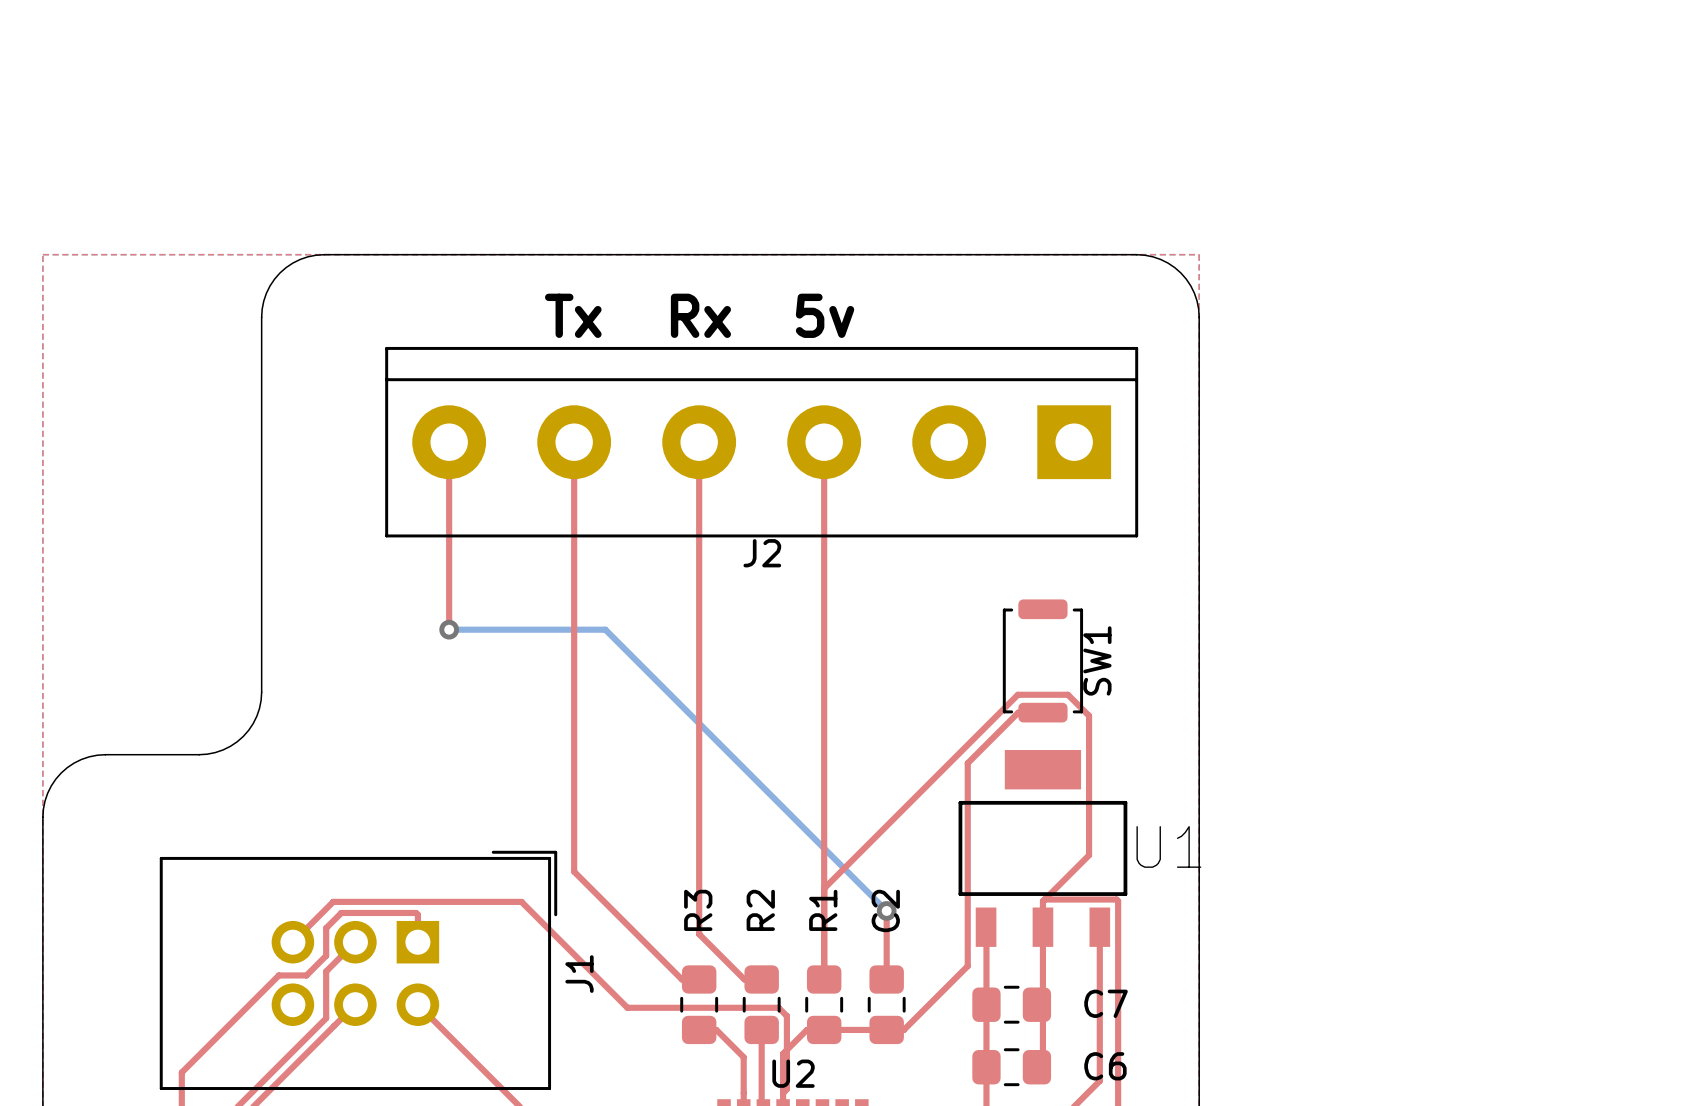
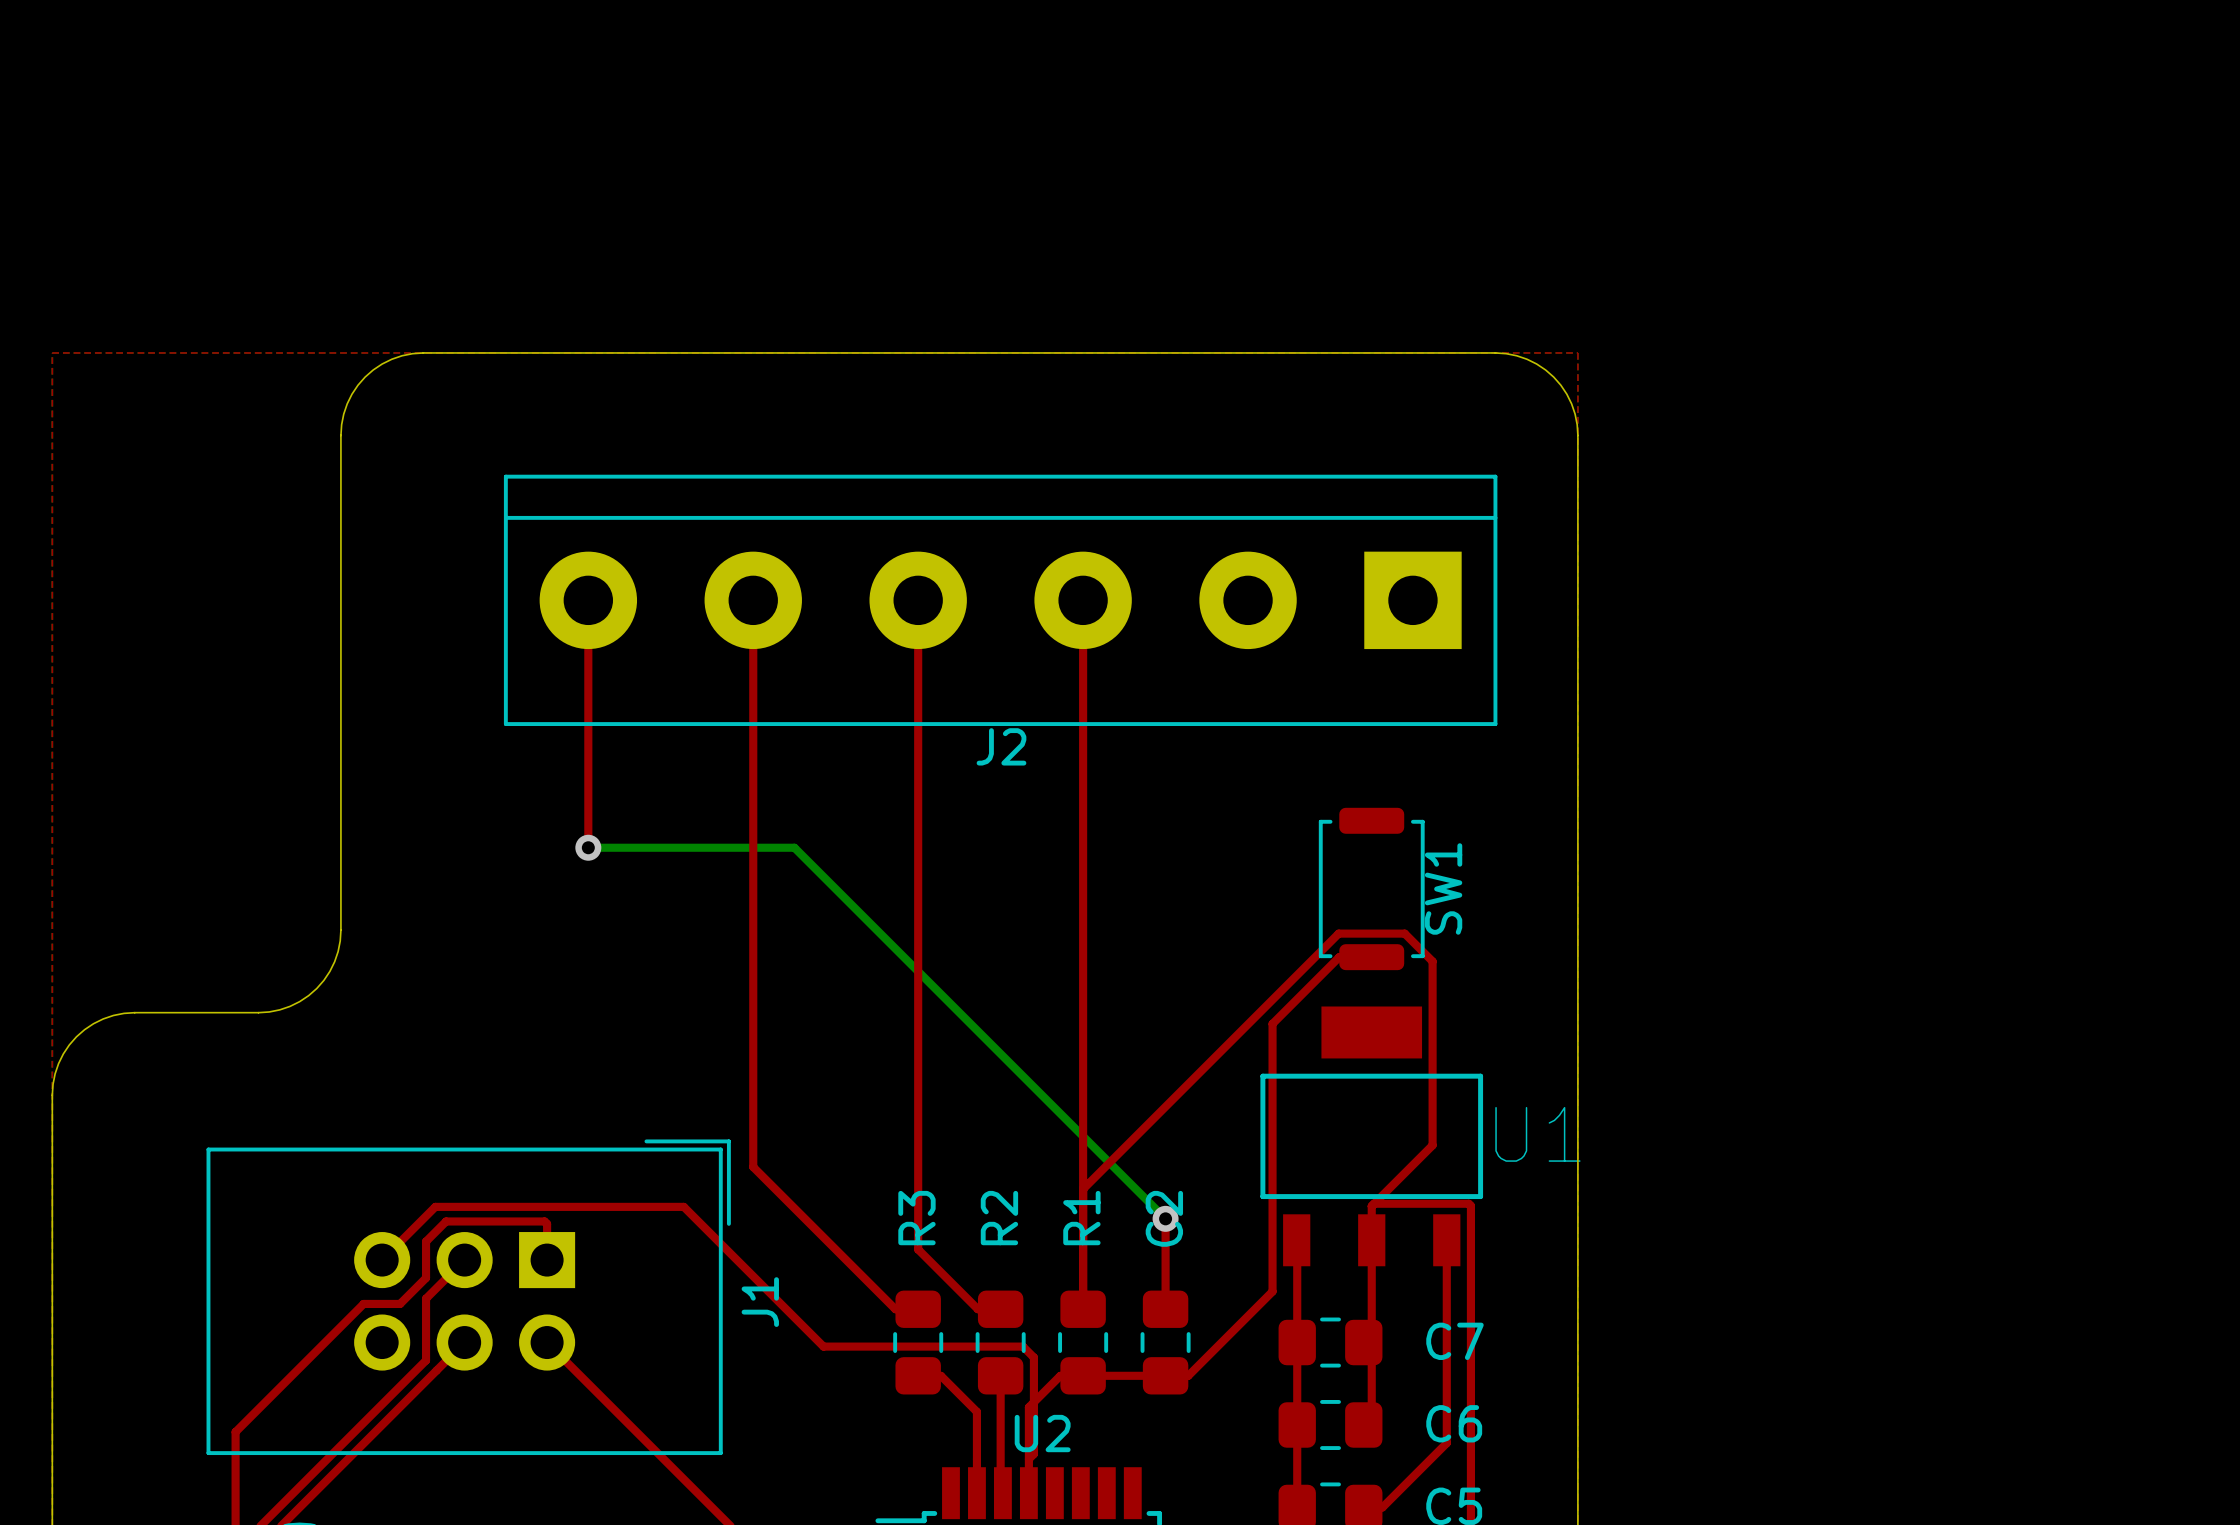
text: Tx (573, 315) -> none
text: Rx (700, 315) -> none
text: 5v (825, 315) -> none

